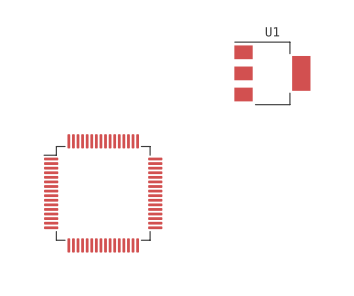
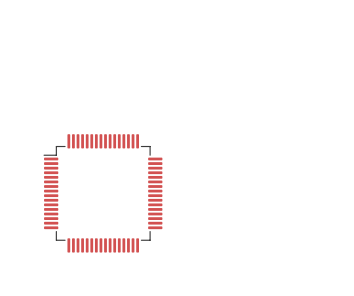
U1: (272, 73) -> none

